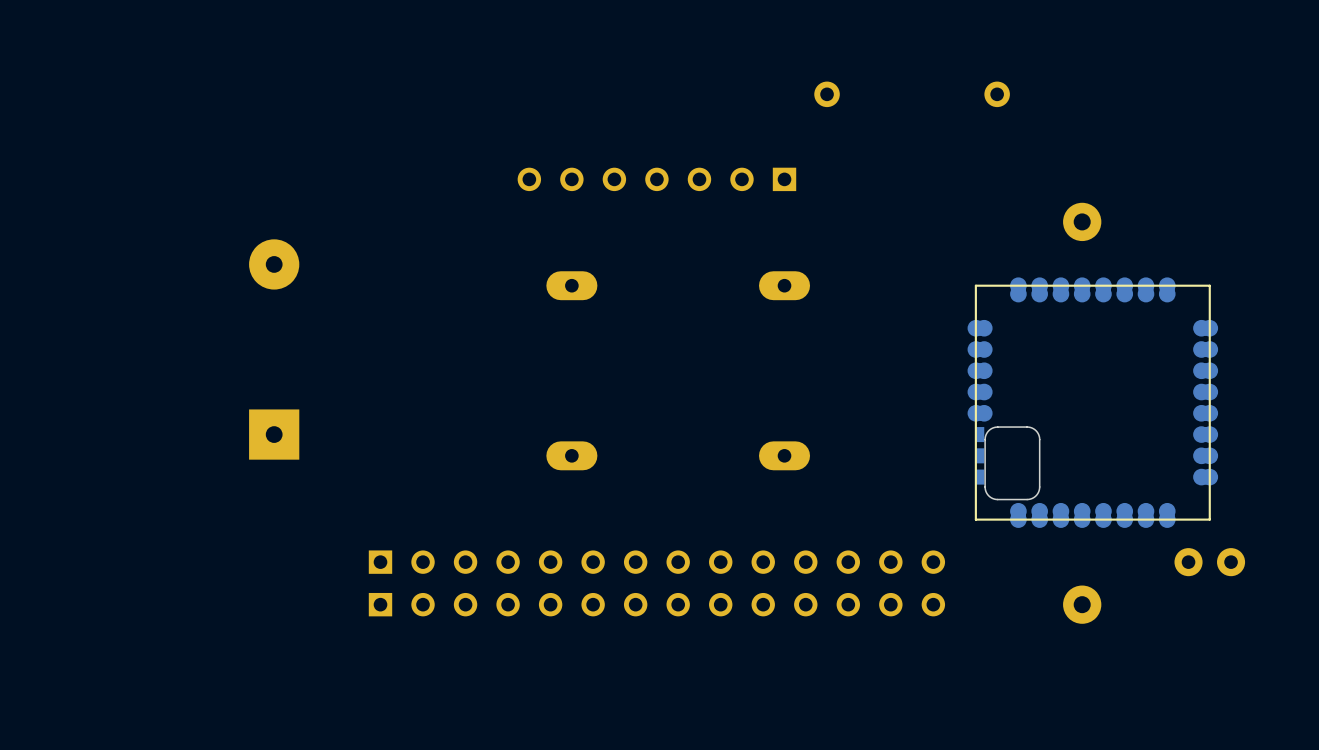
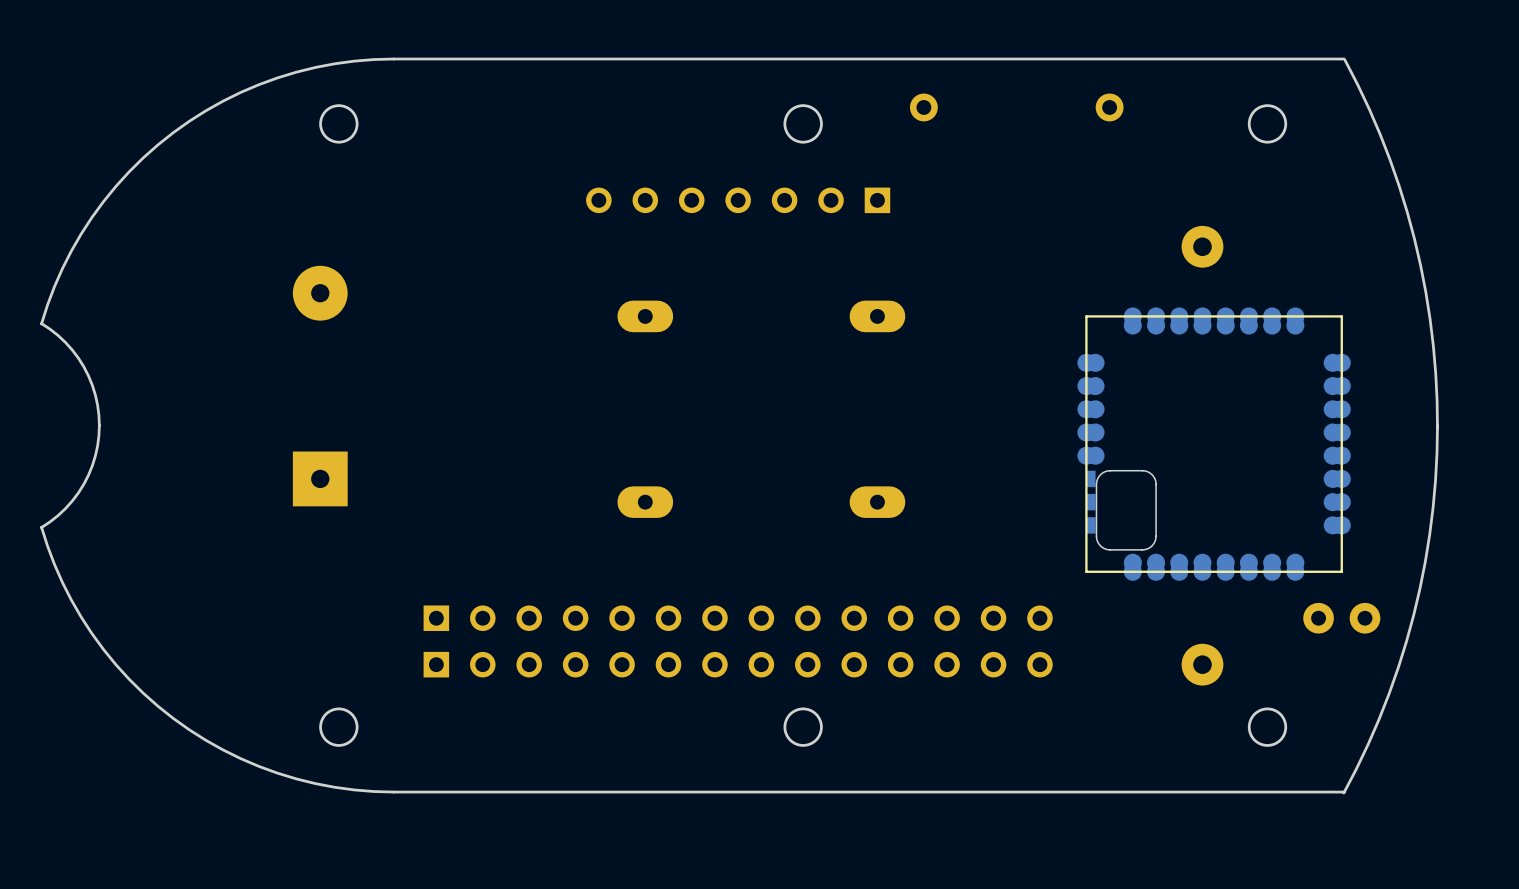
drawing: none -> [40, 57, 1439, 795]

